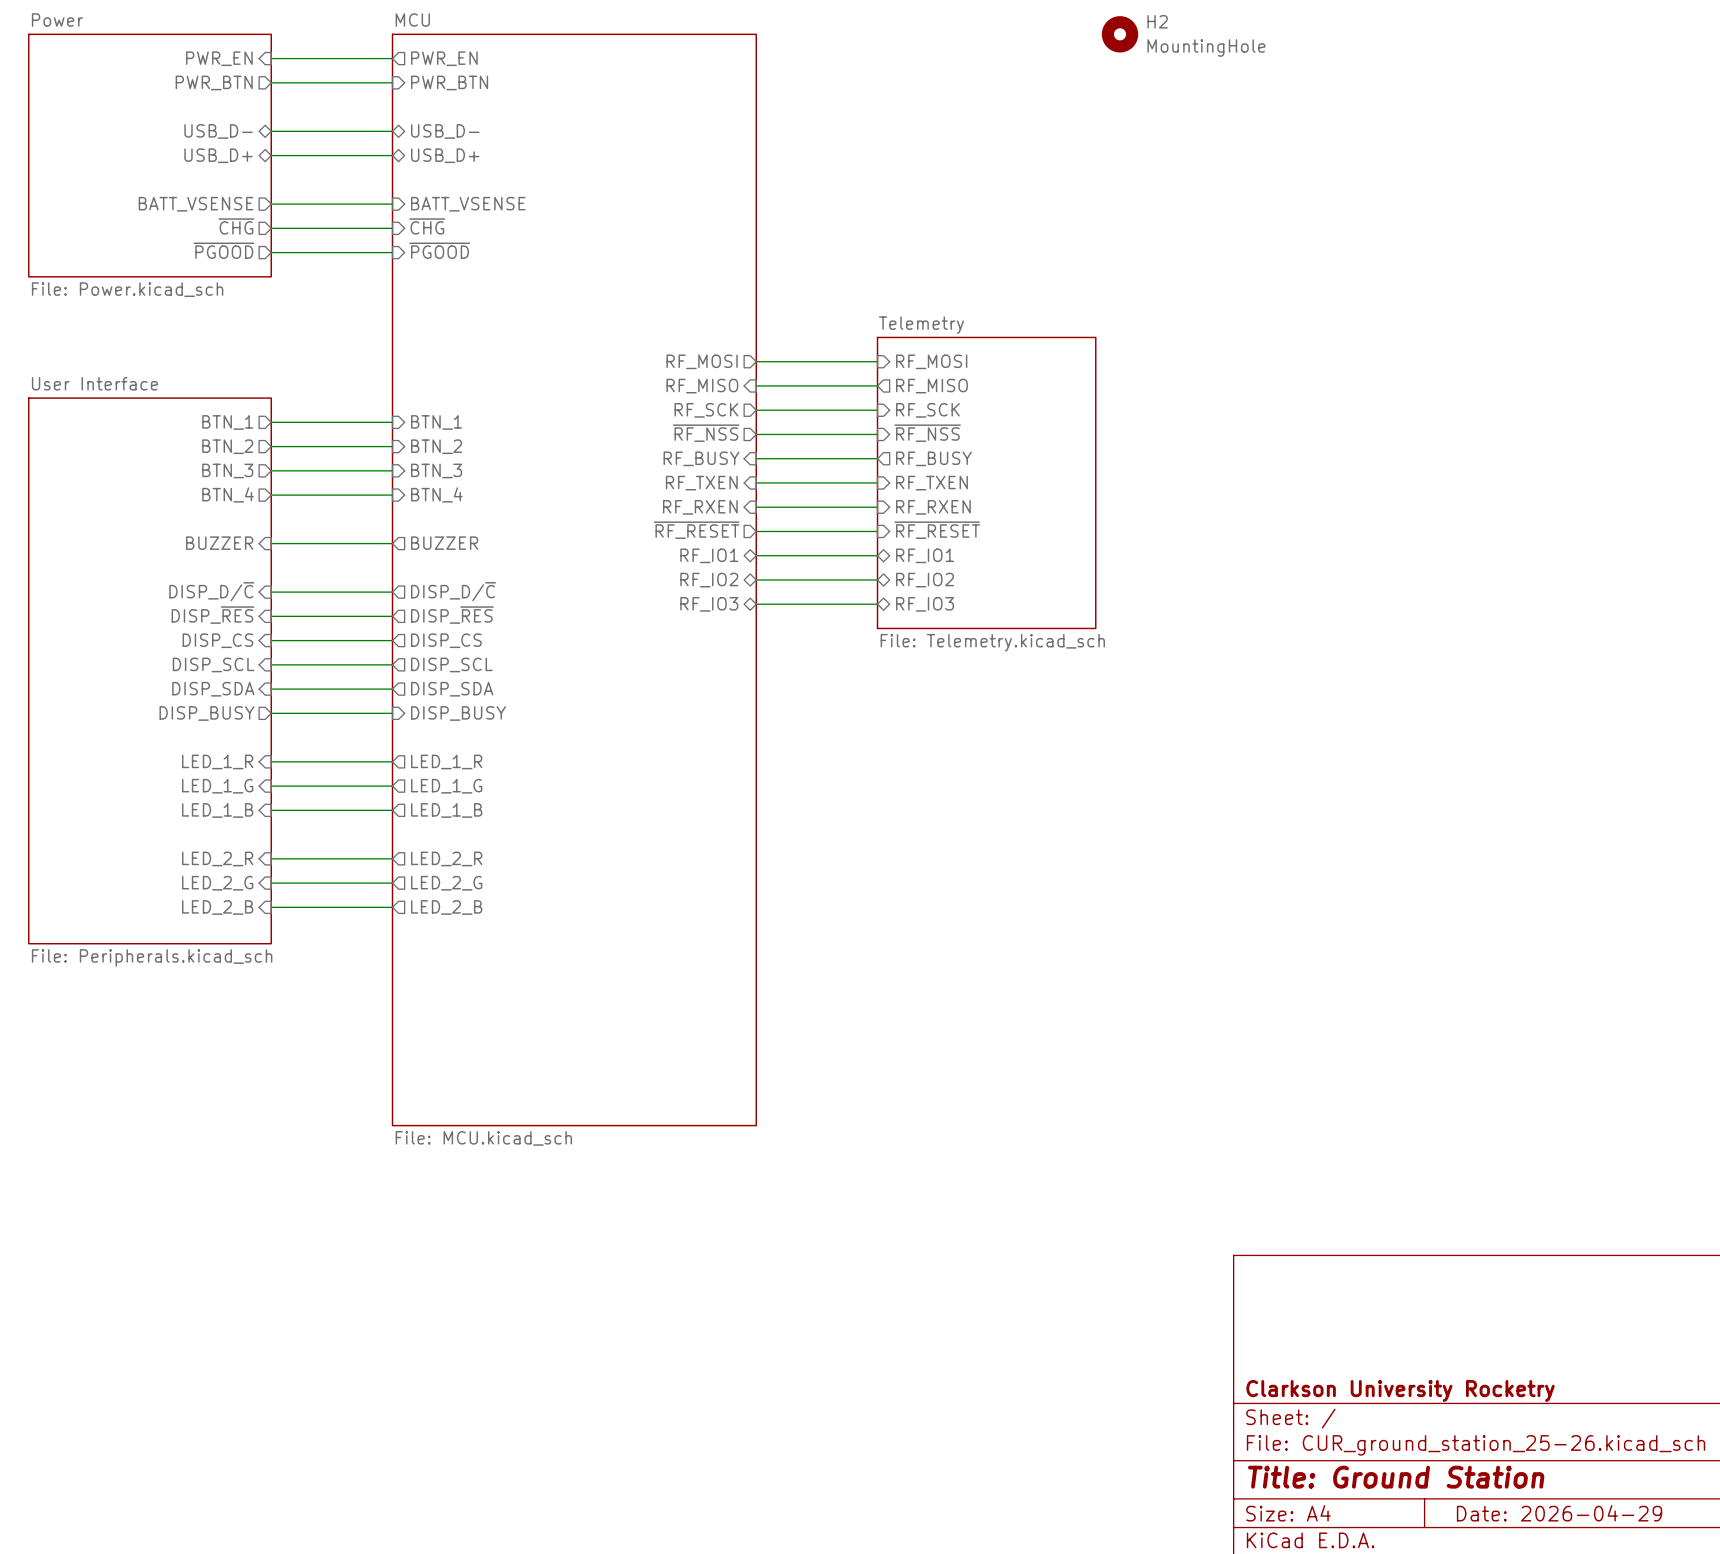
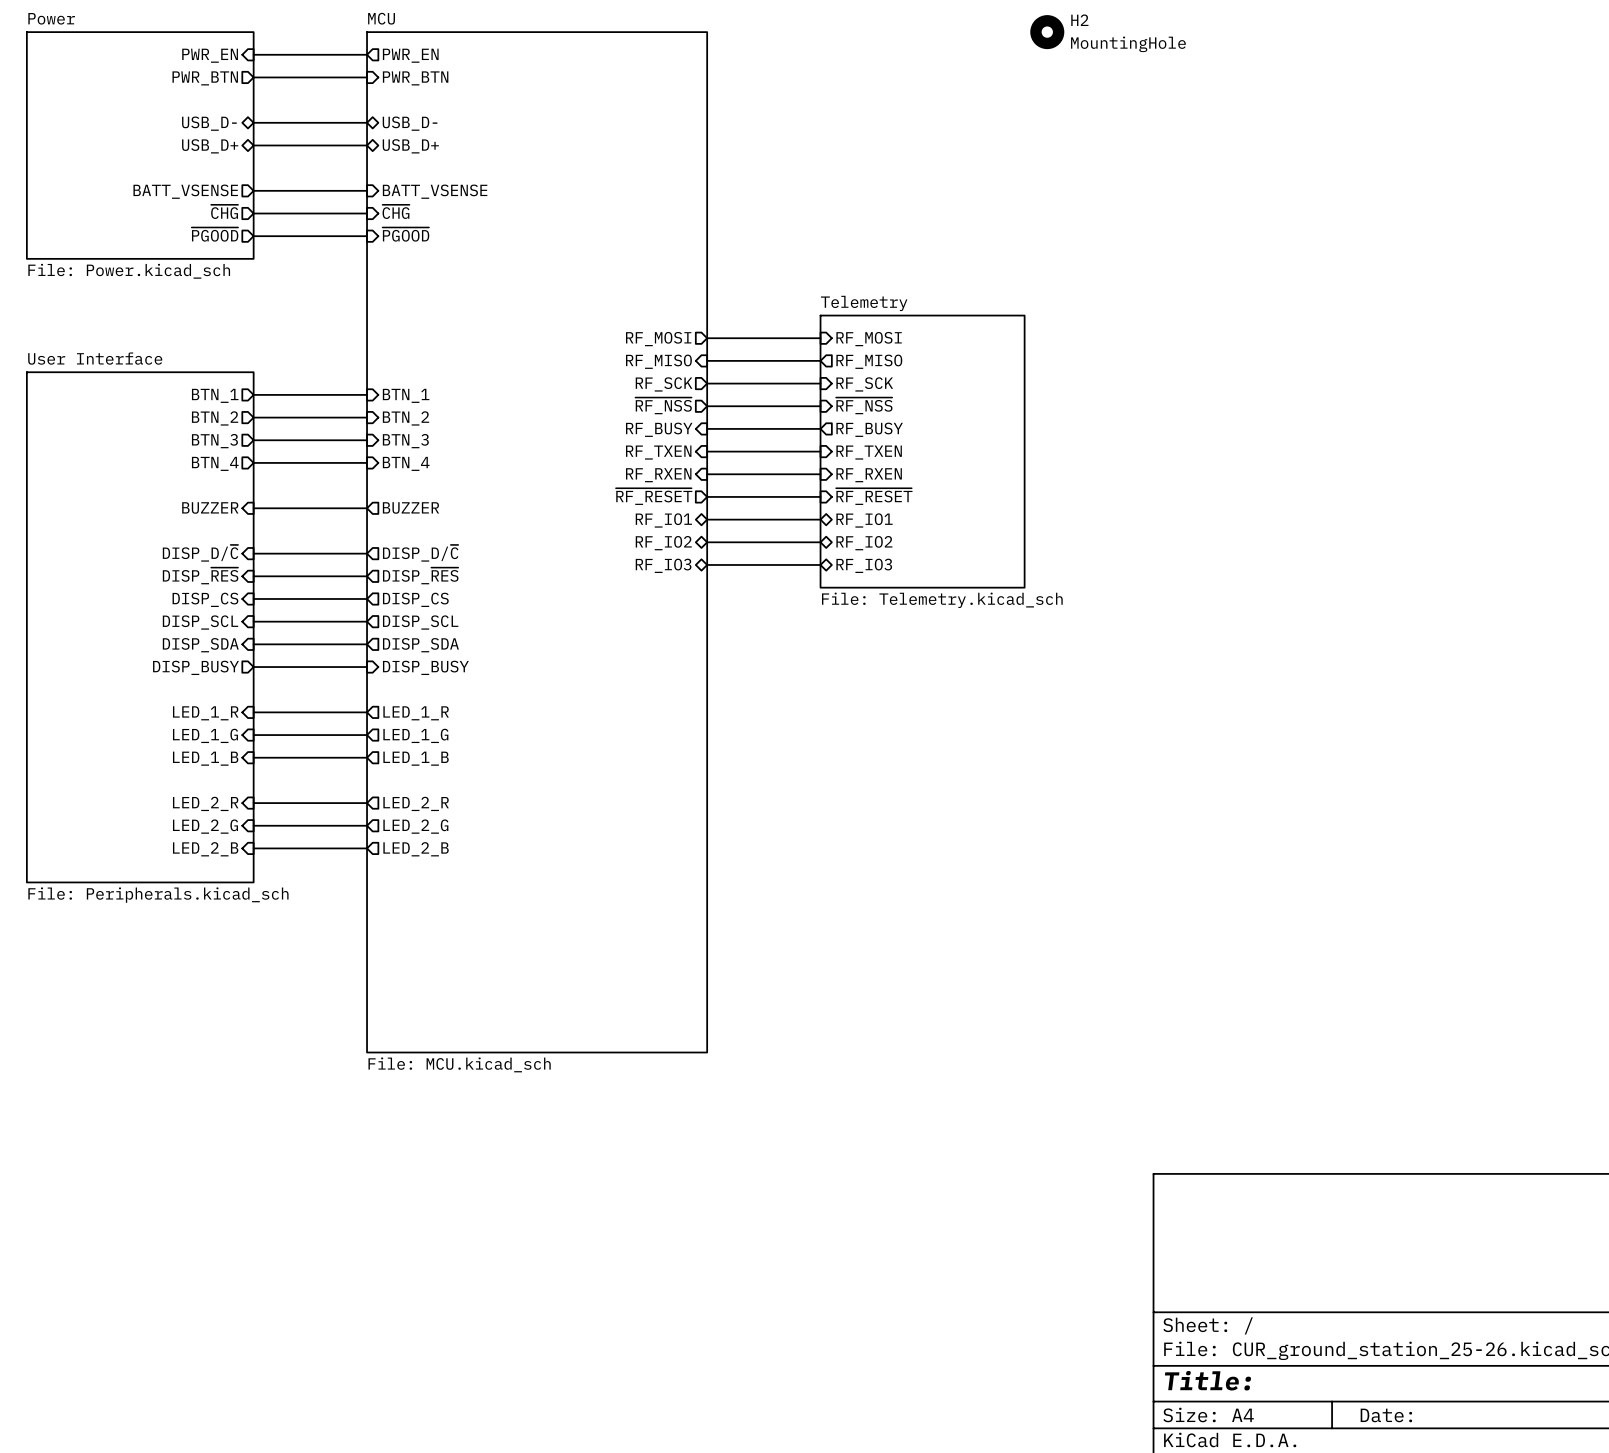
title block: Clarkson University Rocketry (1400, 1390) -> none
title block: Title: Ground Station (1396, 1477) -> Title: (1207, 1380)
title block: Date: 2026-04-29 (1559, 1513) -> Date: (1386, 1415)

